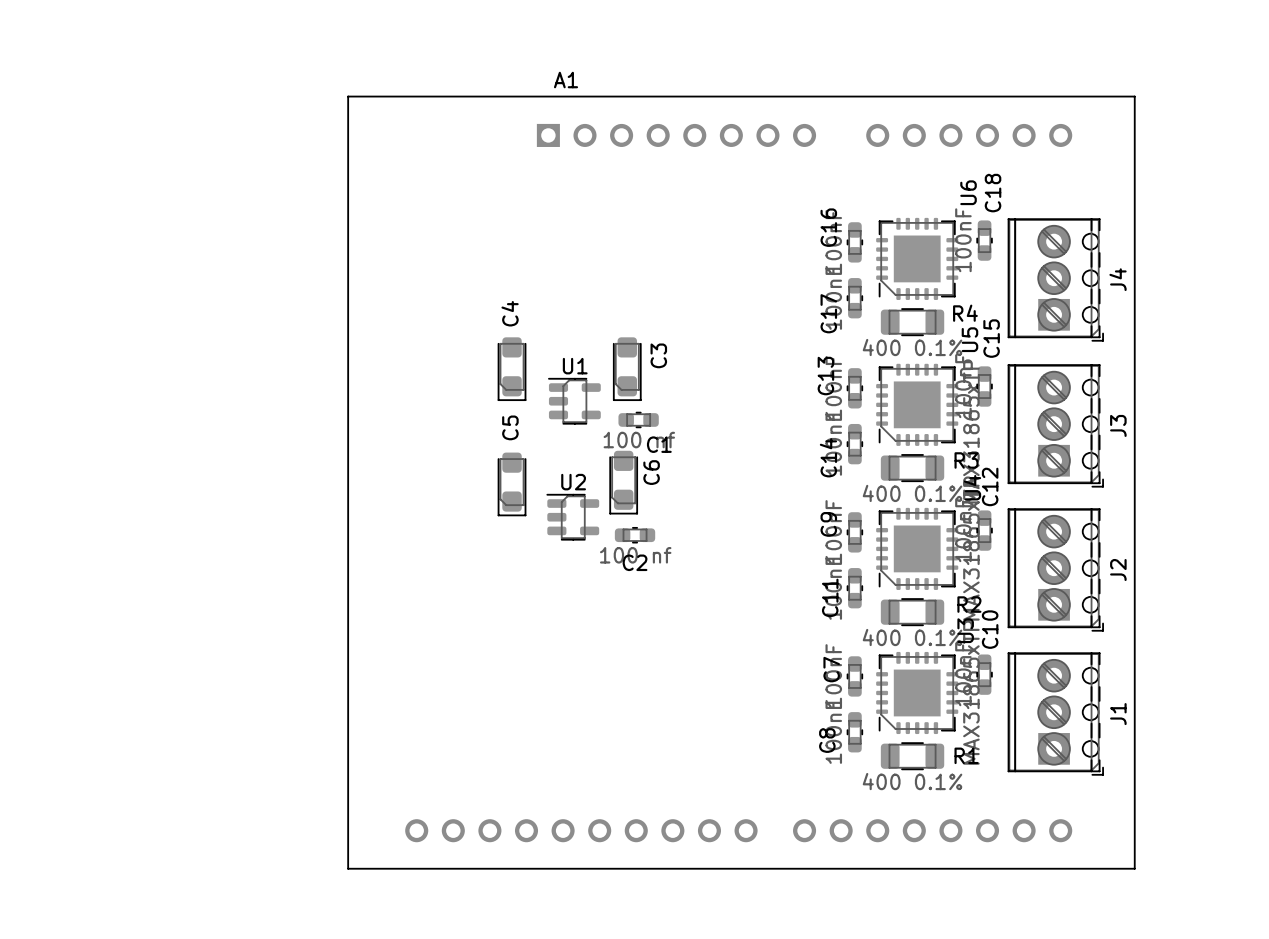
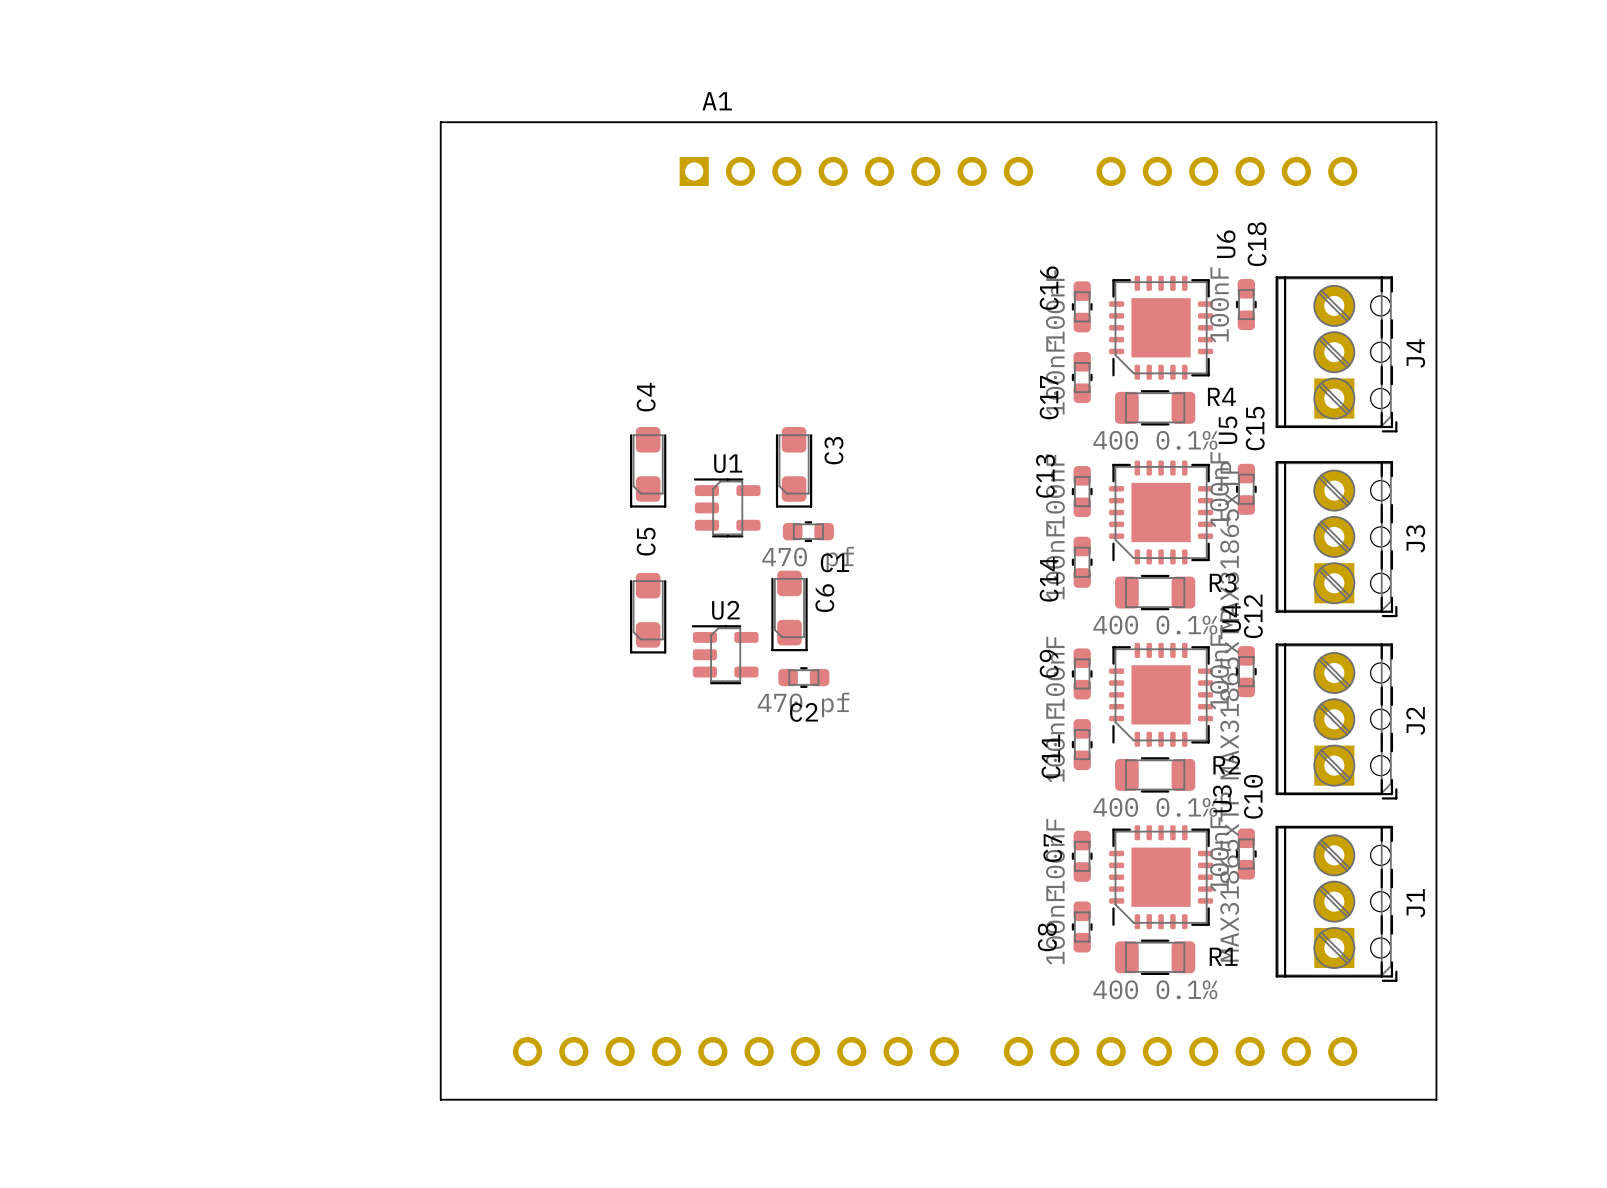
C1 value: 100 nf (639, 440) -> 470 pf (808, 559)
C2 value: 100 nf (635, 555) -> 470 pf (803, 704)

